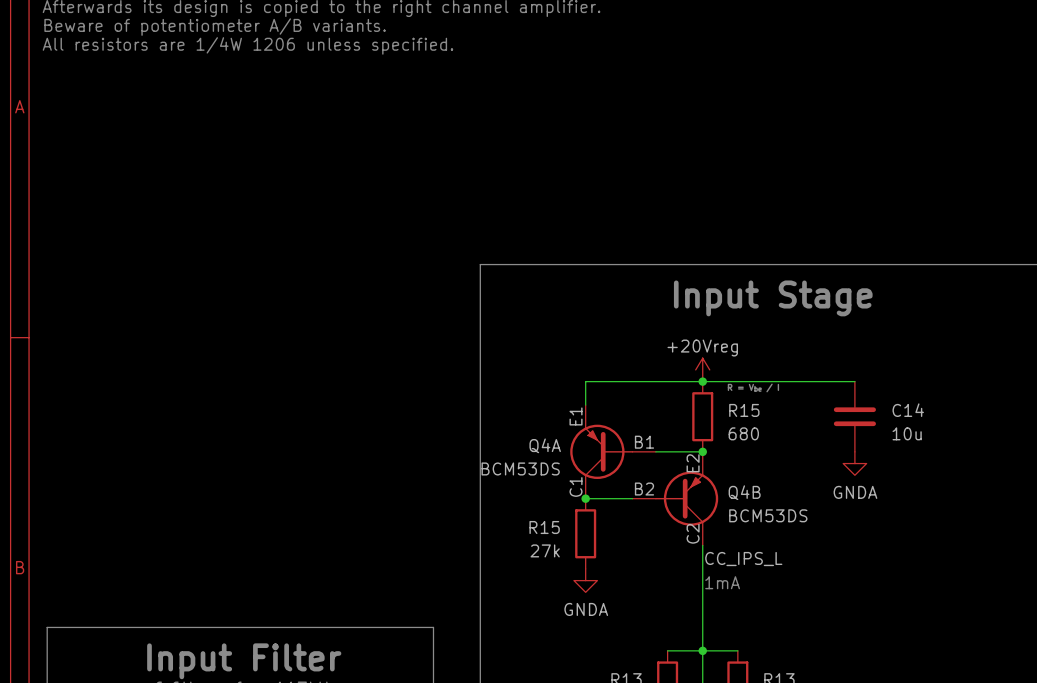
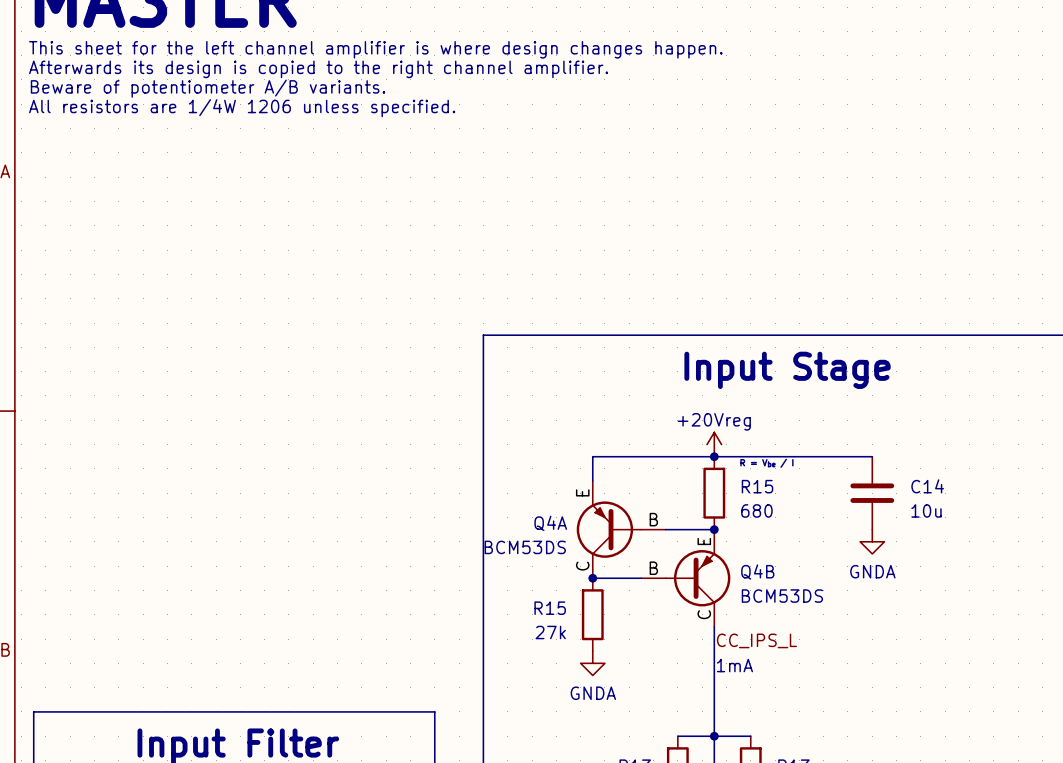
Q4A pin name: E1 (576, 416) -> E (582, 492)
Q4A pin name: B1 (644, 442) -> B (653, 519)
Q4B pin name: E2 (693, 463) -> E (704, 541)
Q4A pin name: C1 (576, 486) -> C (582, 566)
Q4B pin name: B2 (644, 489) -> B (653, 568)
Q4B pin name: C2 (693, 533) -> C (704, 614)

